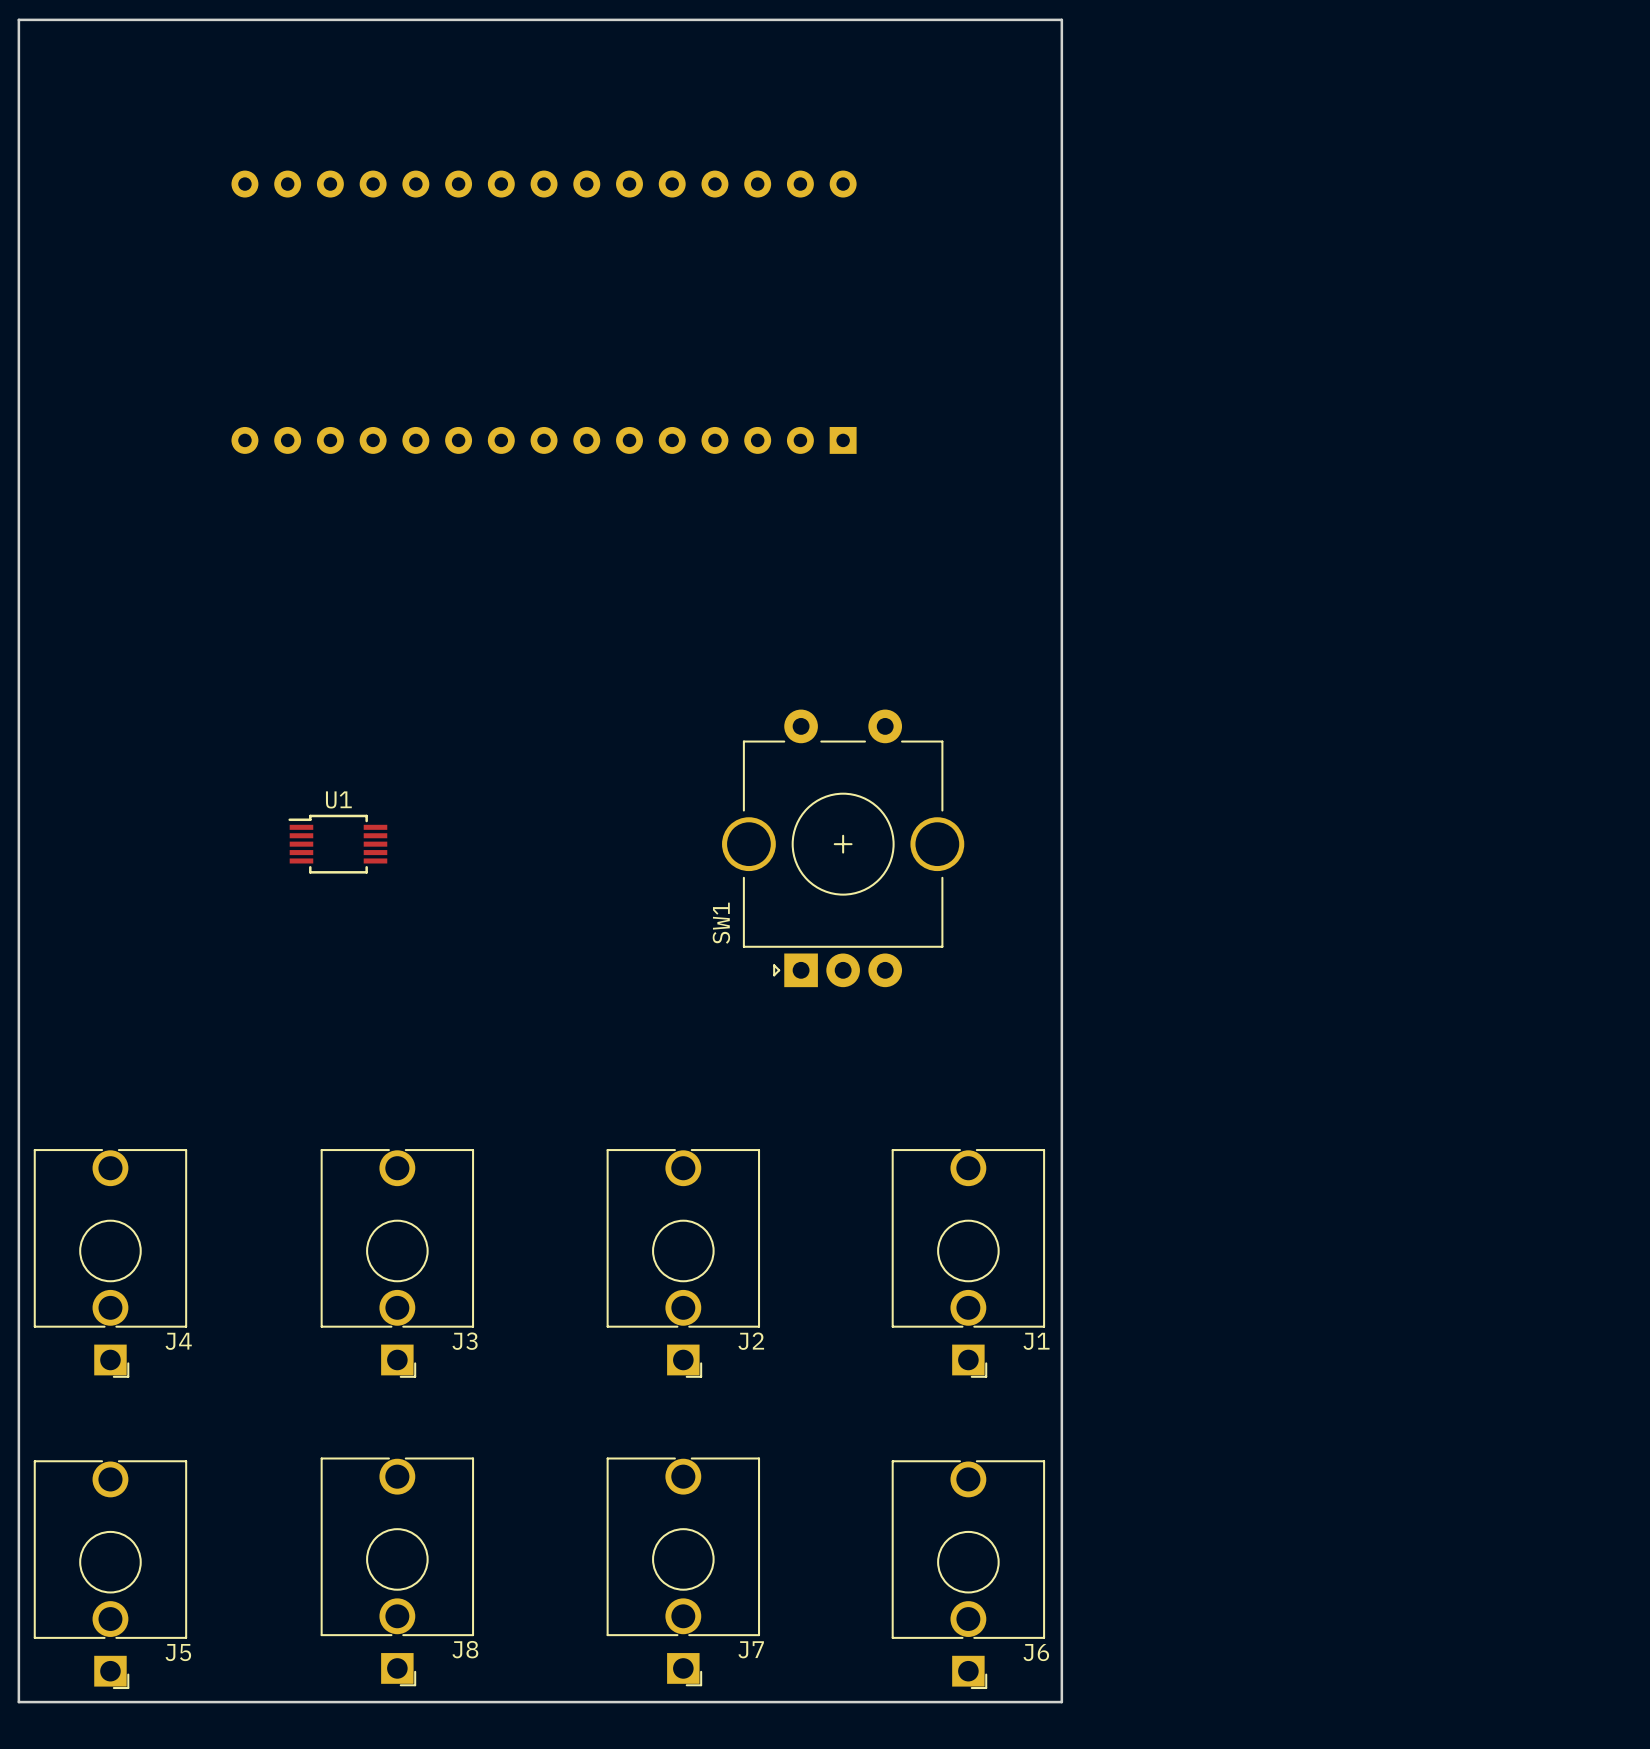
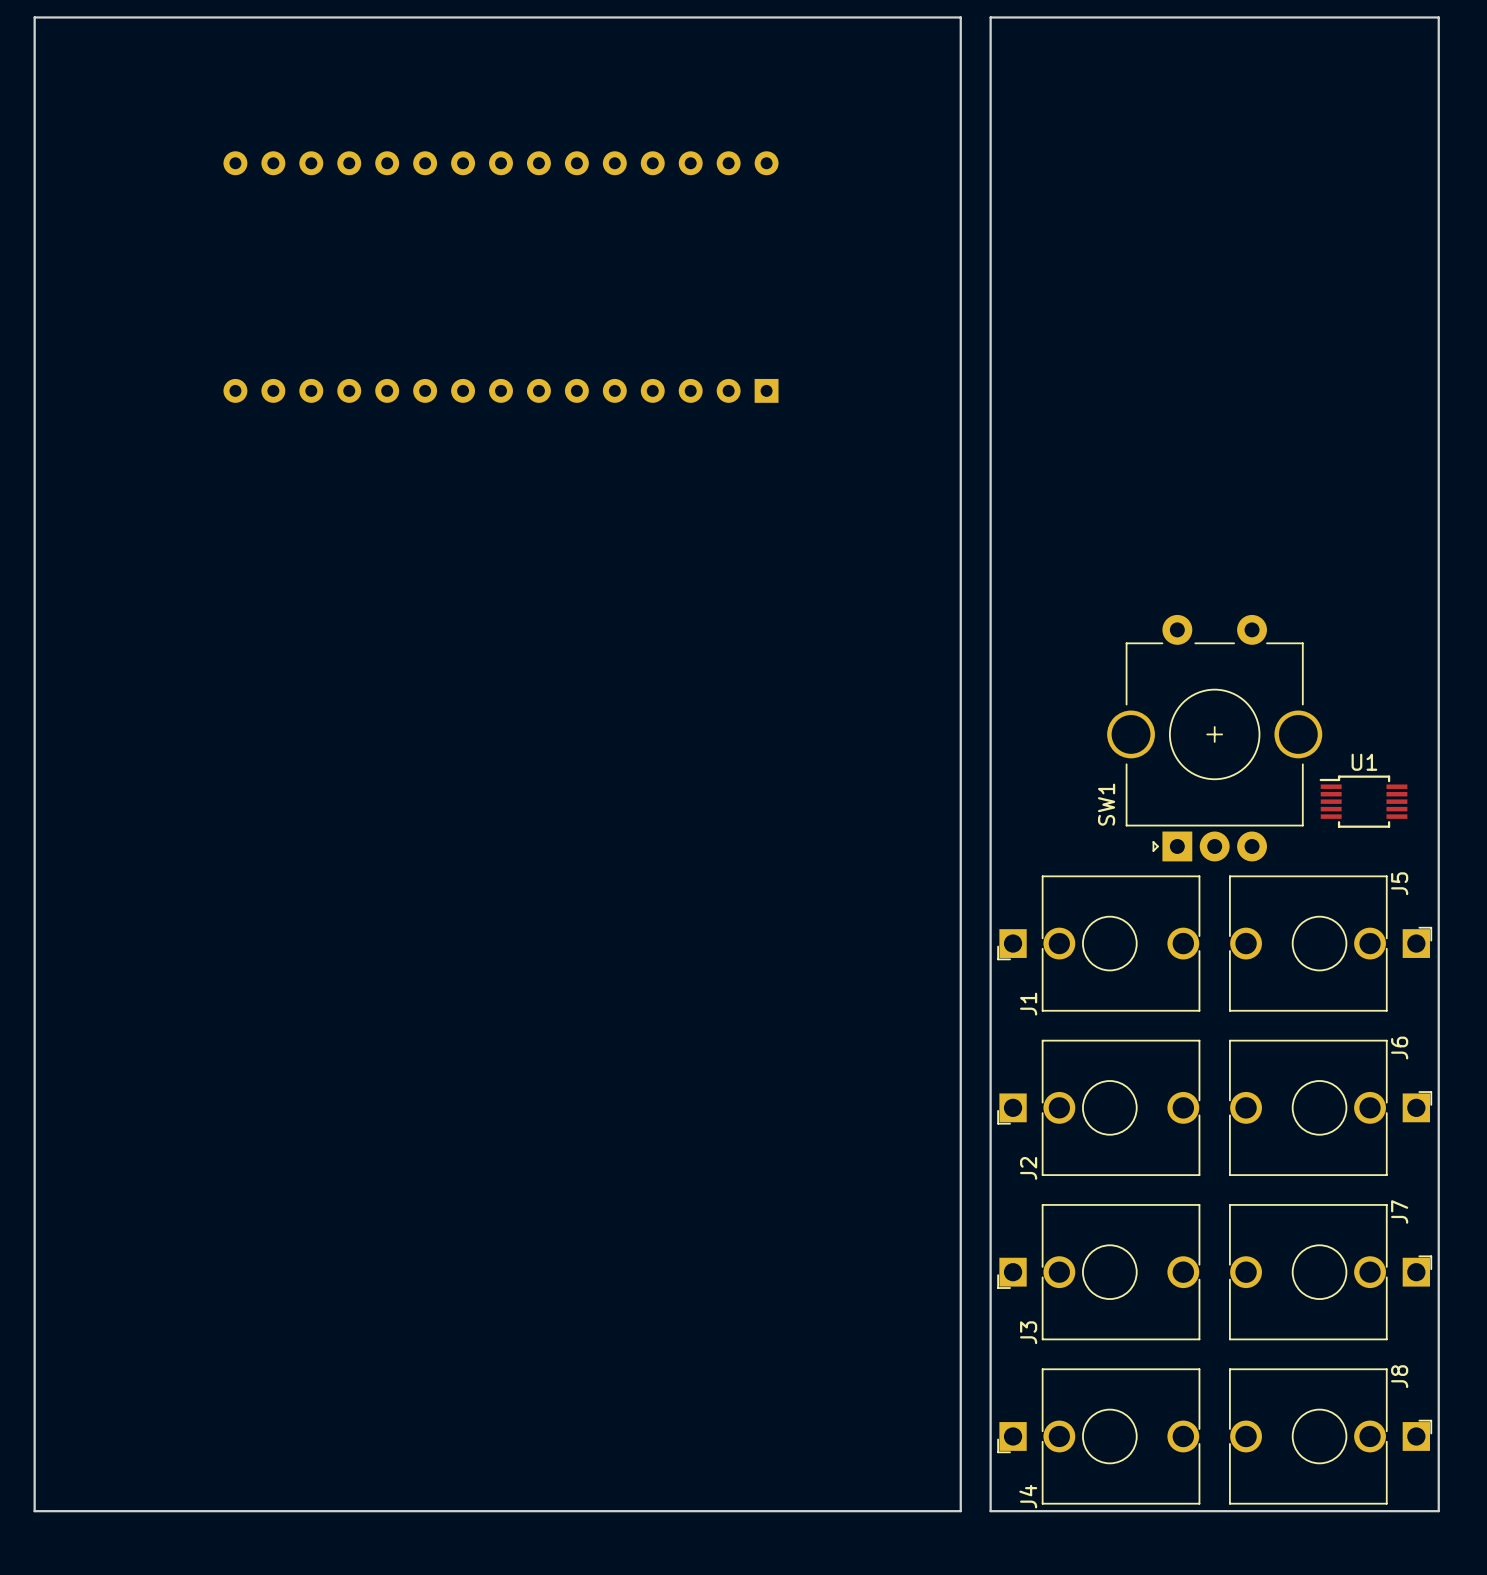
board edge: none -> (990, 17) (1438, 17) (1438, 1511) (990, 1511) (990, 17)
U1 position: (337, 844) -> (1363, 801)
SW1 position: (843, 848) -> (1214, 738)
J4 rotation: 0° (110, 1263) -> 90° clockwise (1098, 1436)
J4 position: (110, 1263) -> (1098, 1436)
J3 rotation: 0° (397, 1263) -> 90° clockwise (1098, 1272)
J3 position: (397, 1263) -> (1098, 1272)
J2 rotation: 0° (683, 1263) -> 90° clockwise (1098, 1107)
J2 position: (683, 1263) -> (1098, 1107)
J1 rotation: 0° (968, 1263) -> 90° clockwise (1098, 943)
J1 position: (968, 1263) -> (1098, 943)
J8 rotation: 0° (397, 1571) -> 90° counterclockwise (1330, 1436)
J8 position: (397, 1571) -> (1330, 1436)
J7 rotation: 0° (683, 1571) -> 90° counterclockwise (1330, 1272)
J7 position: (683, 1571) -> (1330, 1272)
J5 rotation: 0° (110, 1574) -> 90° counterclockwise (1330, 943)
J5 position: (110, 1574) -> (1330, 943)
J6 rotation: 0° (968, 1574) -> 90° counterclockwise (1330, 1107)
J6 position: (968, 1574) -> (1330, 1107)

